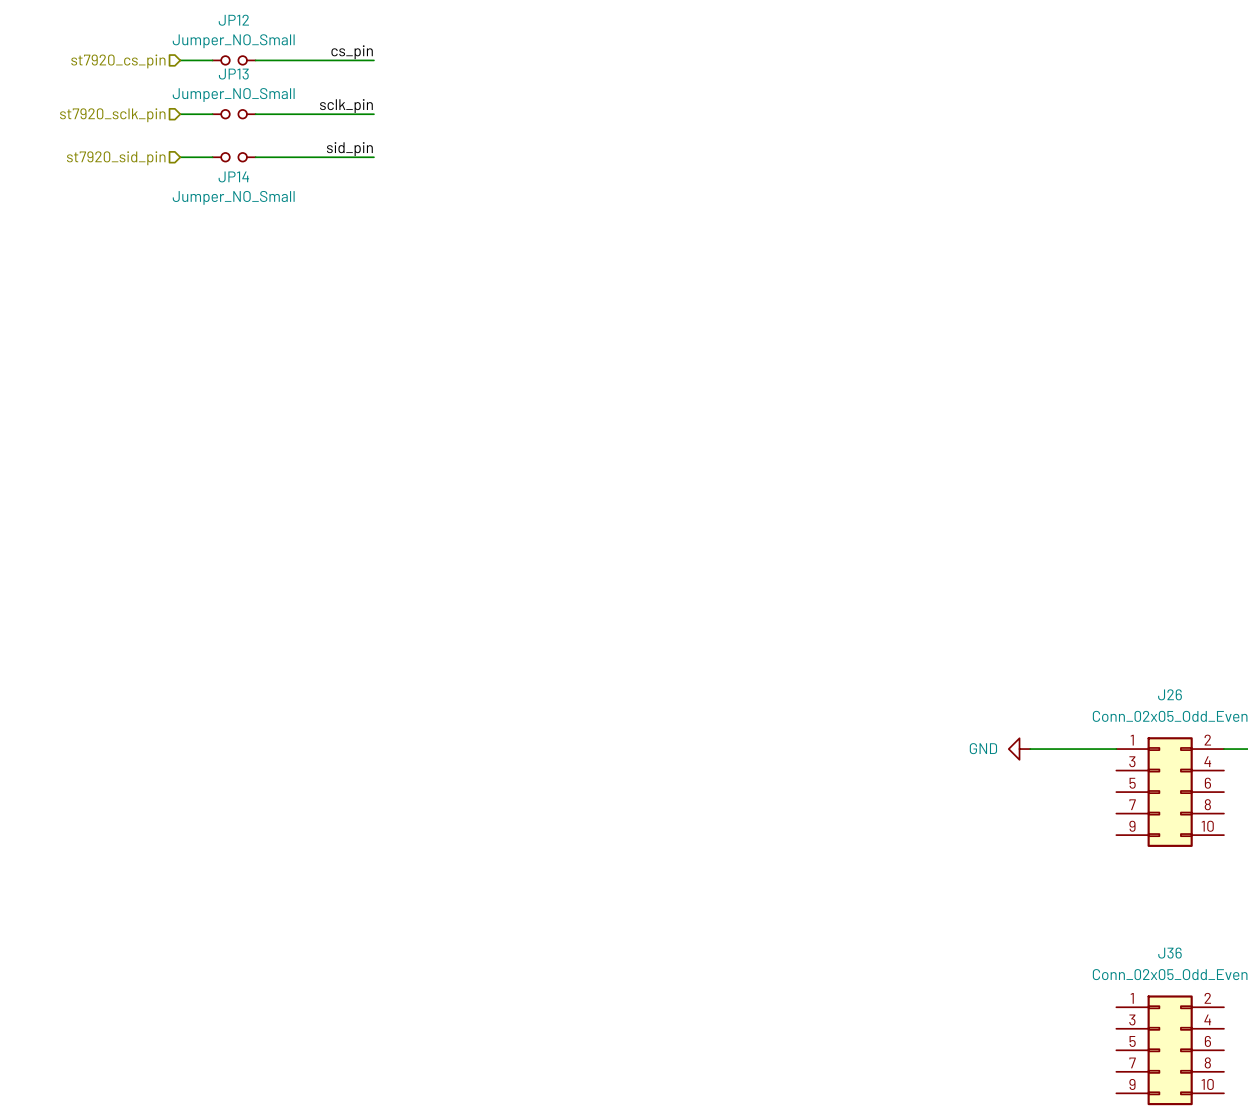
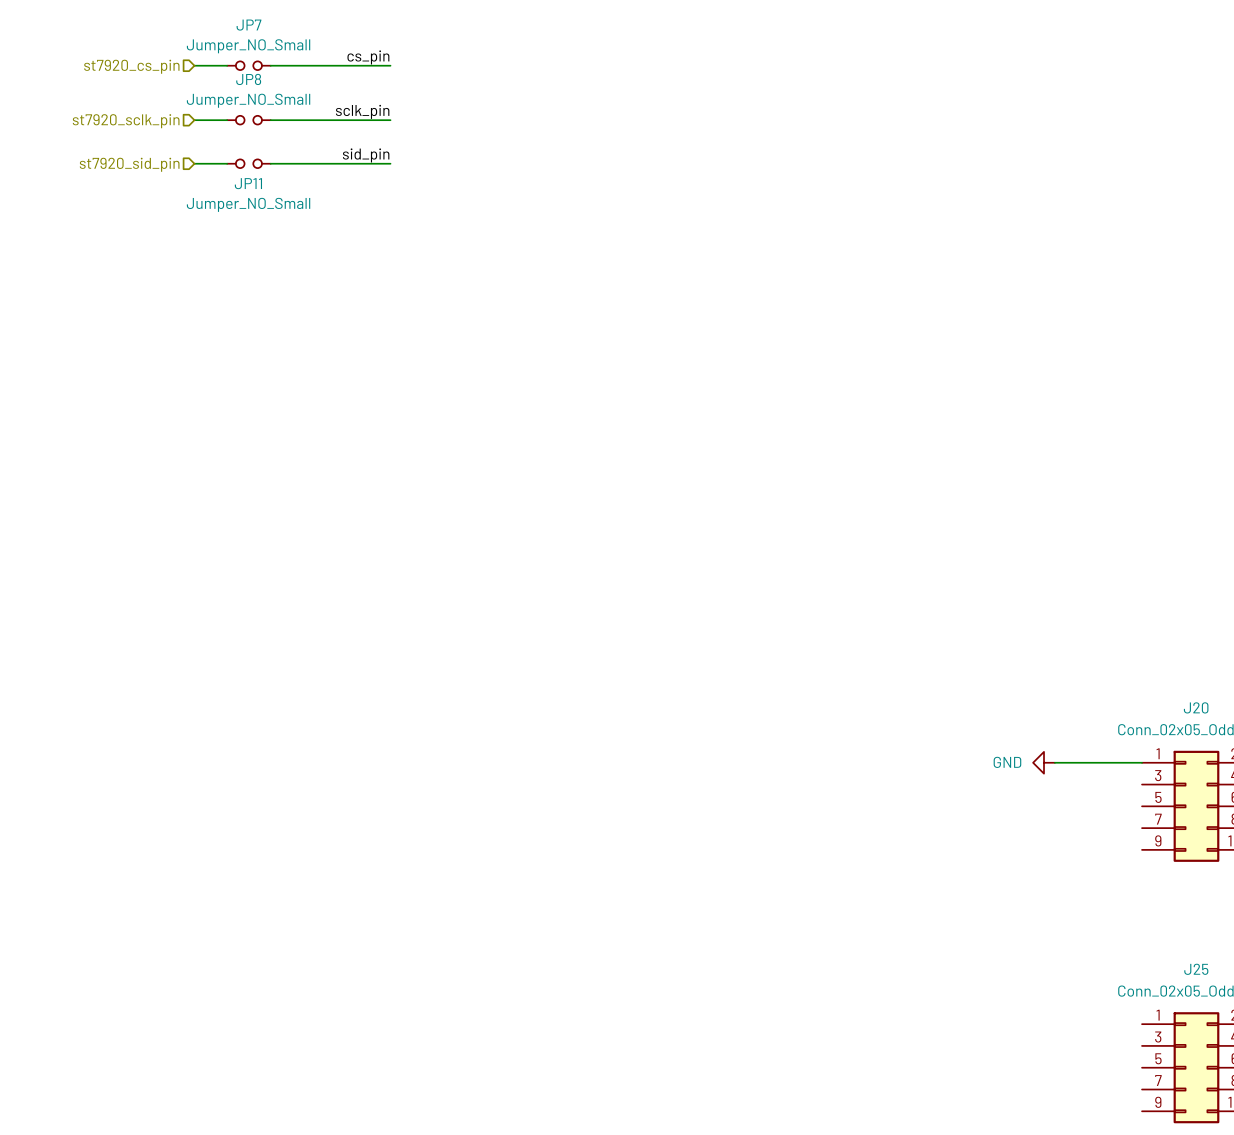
JP12 name: JP12 (233, 20) -> JP7 (248, 25)
JP13 name: JP13 (233, 74) -> JP8 (248, 79)
JP14 name: JP14 (233, 176) -> JP11 (248, 183)
J26 name: J26 (1170, 694) -> J20 (1196, 707)
J36 name: J36 (1170, 953) -> J25 (1196, 969)

